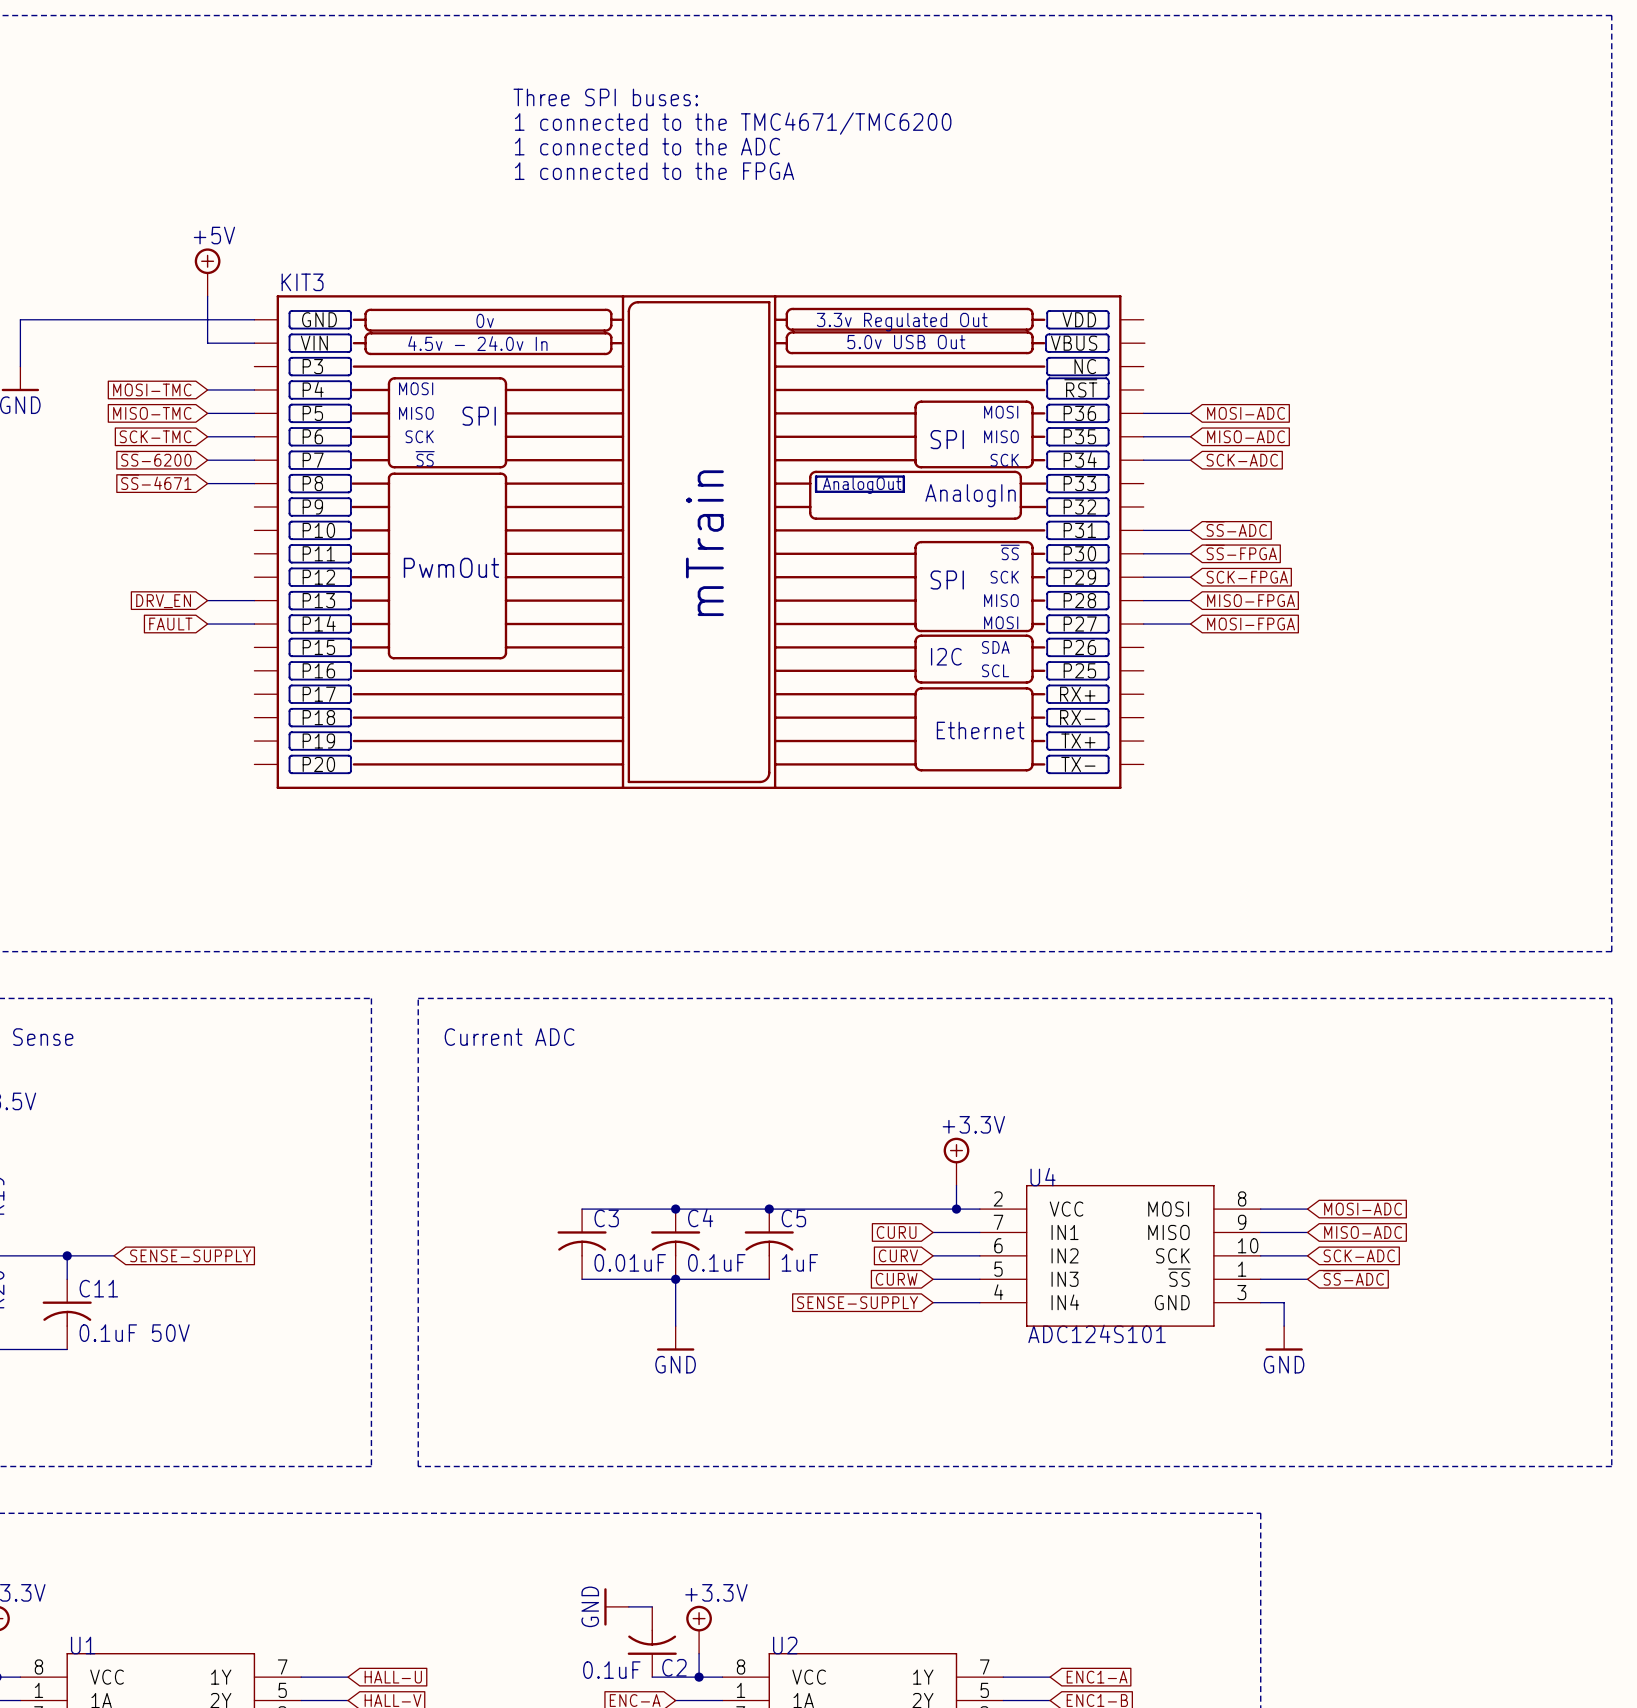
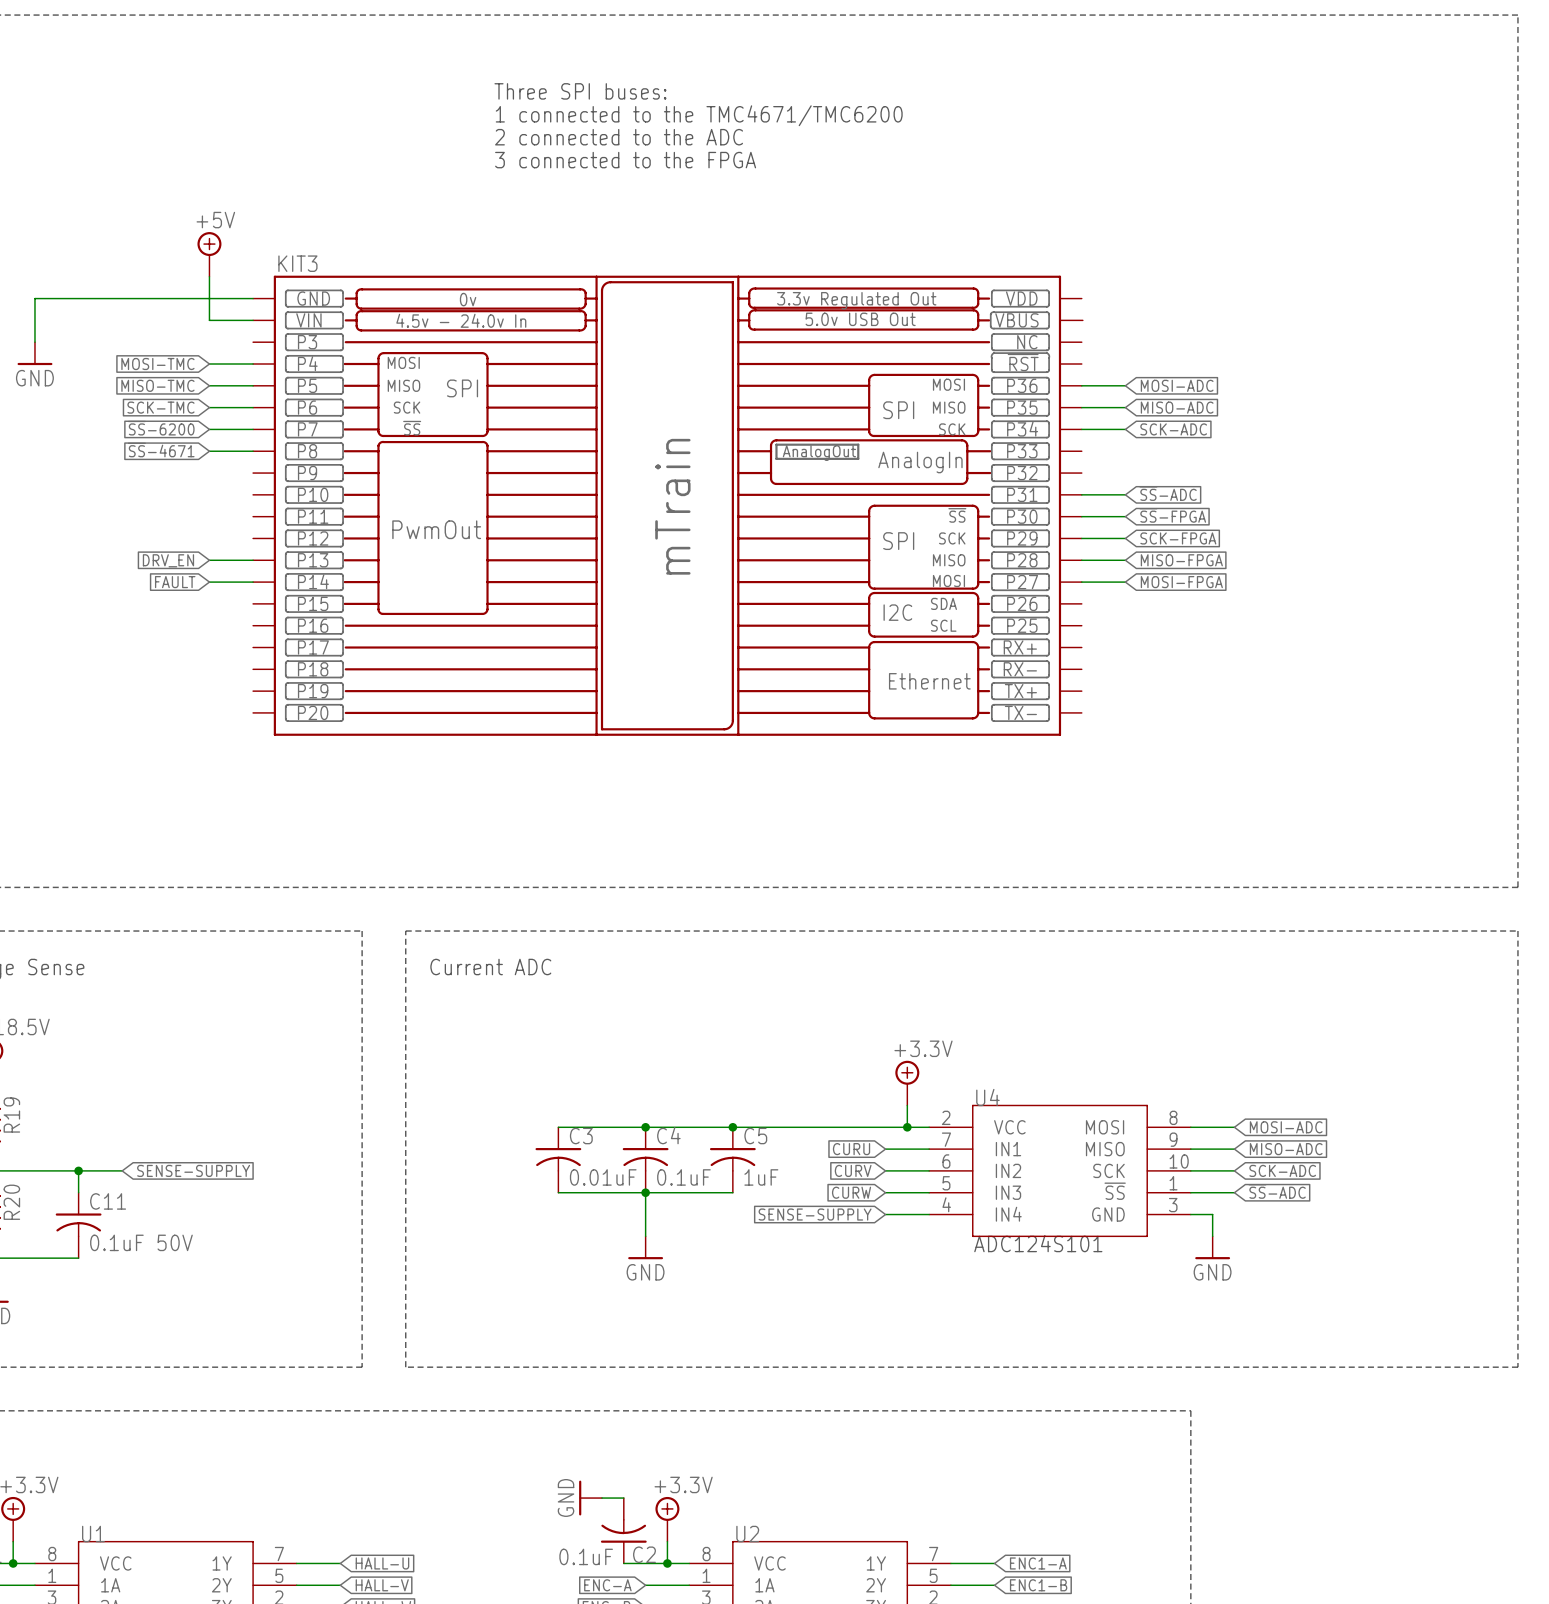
text: 1 connected to the ADC (647, 146) -> 2 connected to the ADC (619, 137)
text: 1 connected to the FPGA (654, 171) -> 3 connected to the FPGA (625, 160)

